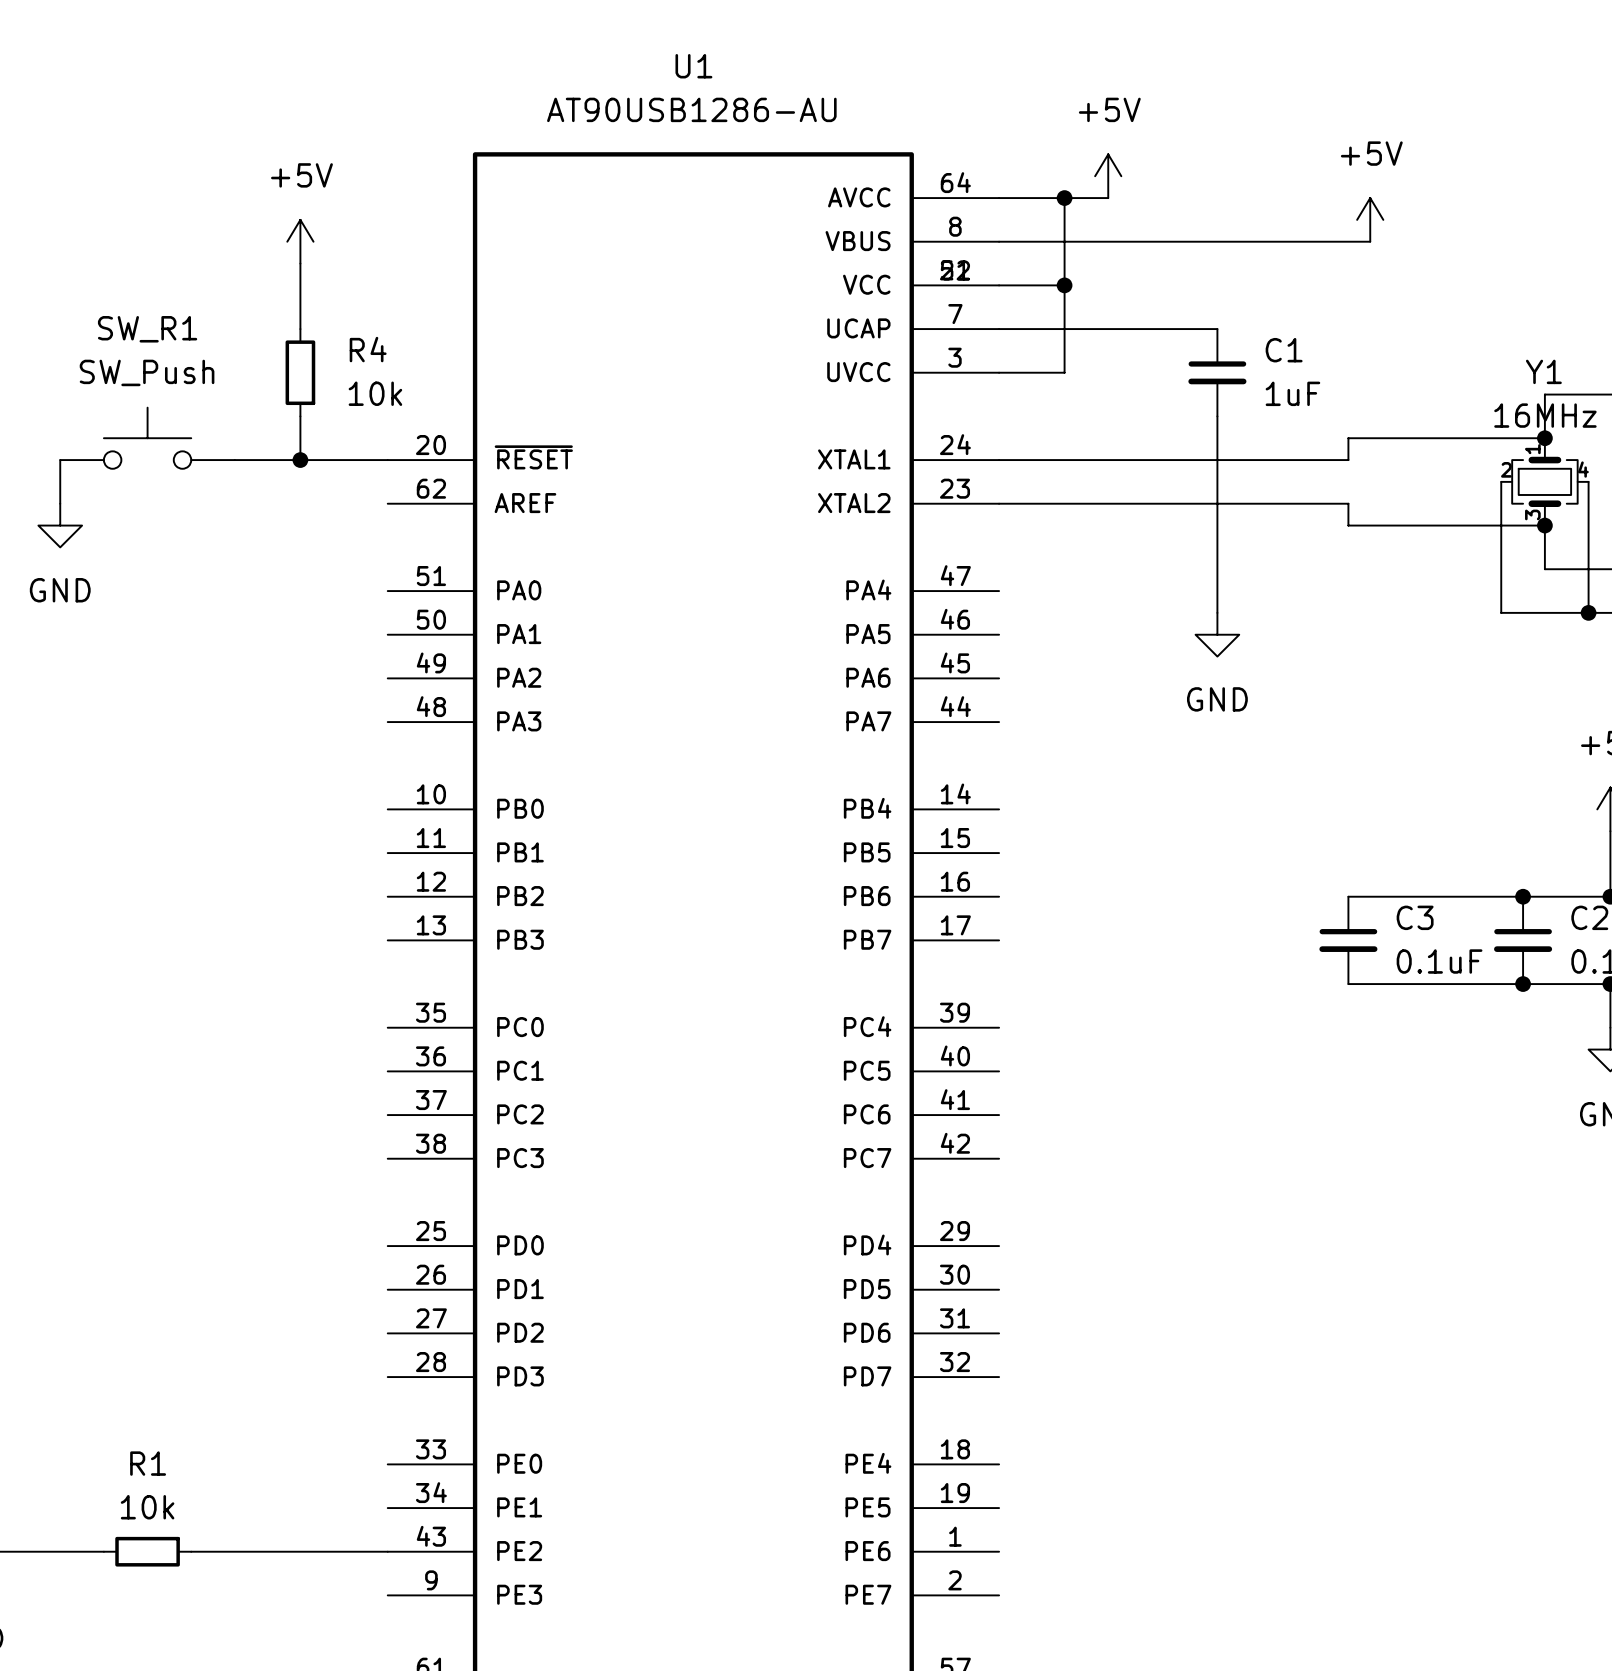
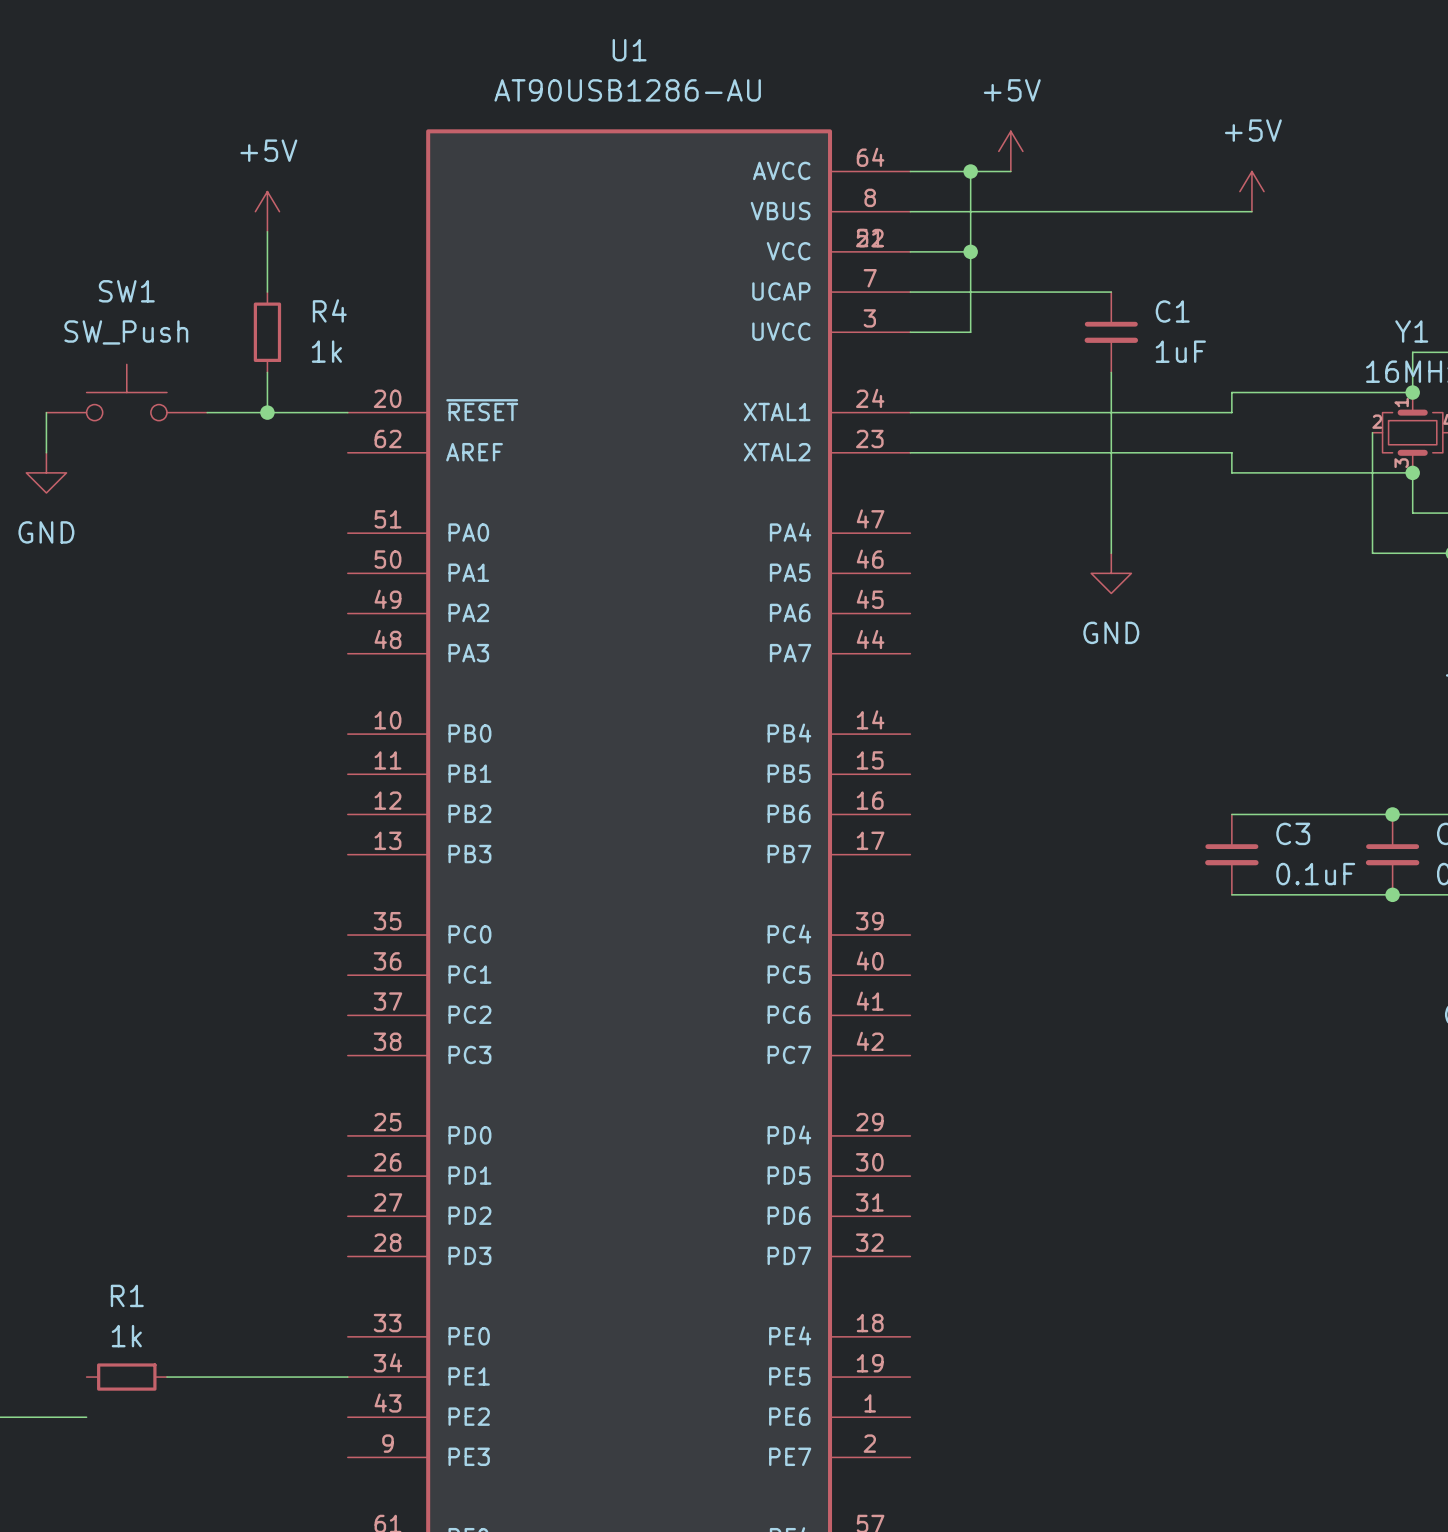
SW_R1 name: SW_R1 (147, 329) -> SW1 (126, 291)
R4 value: 10k (375, 393) -> 1k (326, 351)
R1 value: 10k (147, 1507) -> 1k (126, 1336)
R1 position: (147, 1551) -> (126, 1377)
wire: (191, 1551) (387, 1551) -> (166, 1377) (347, 1377)

